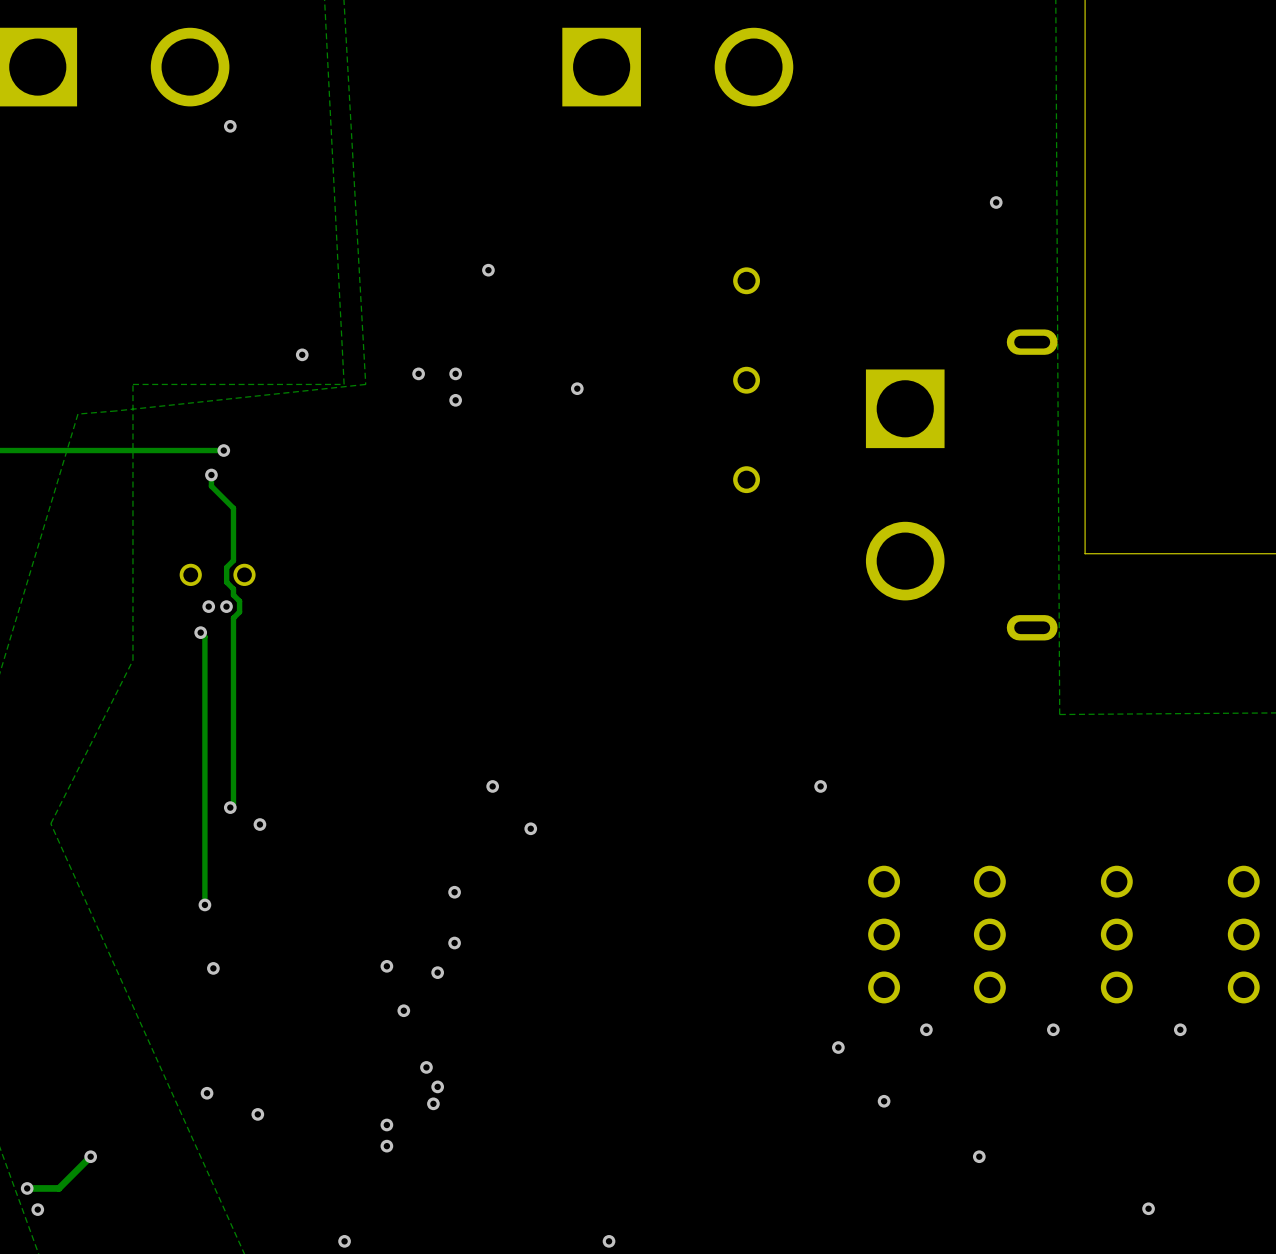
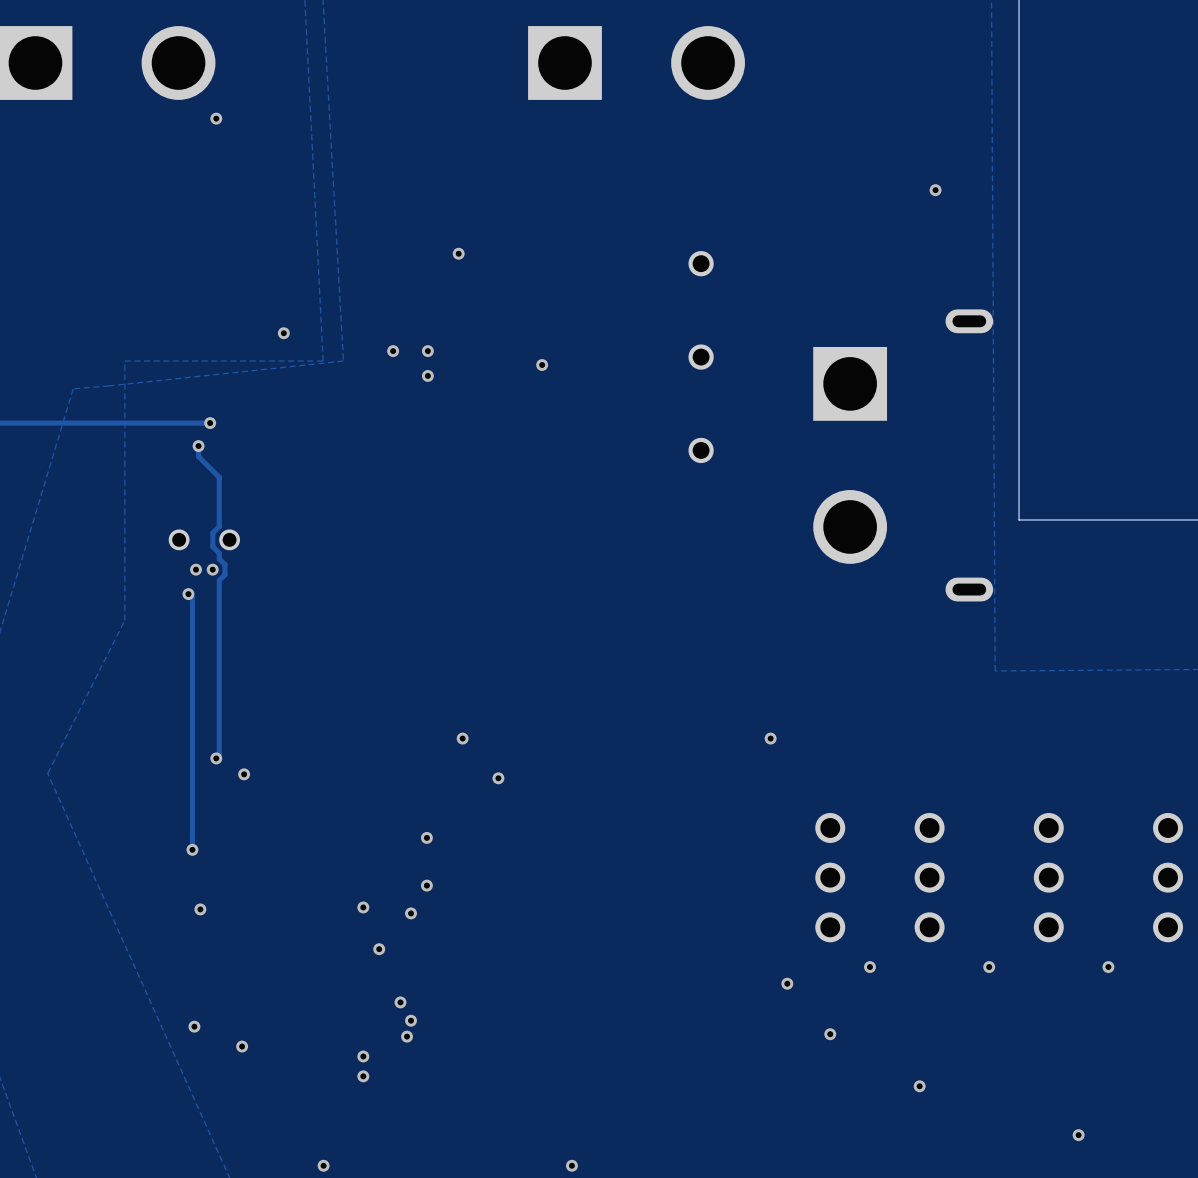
track: (90, 1156) (58, 1188) (27, 1188) -> none
via: (90, 1156) -> none
via: (27, 1188) -> none
via: (37, 1209) -> none

